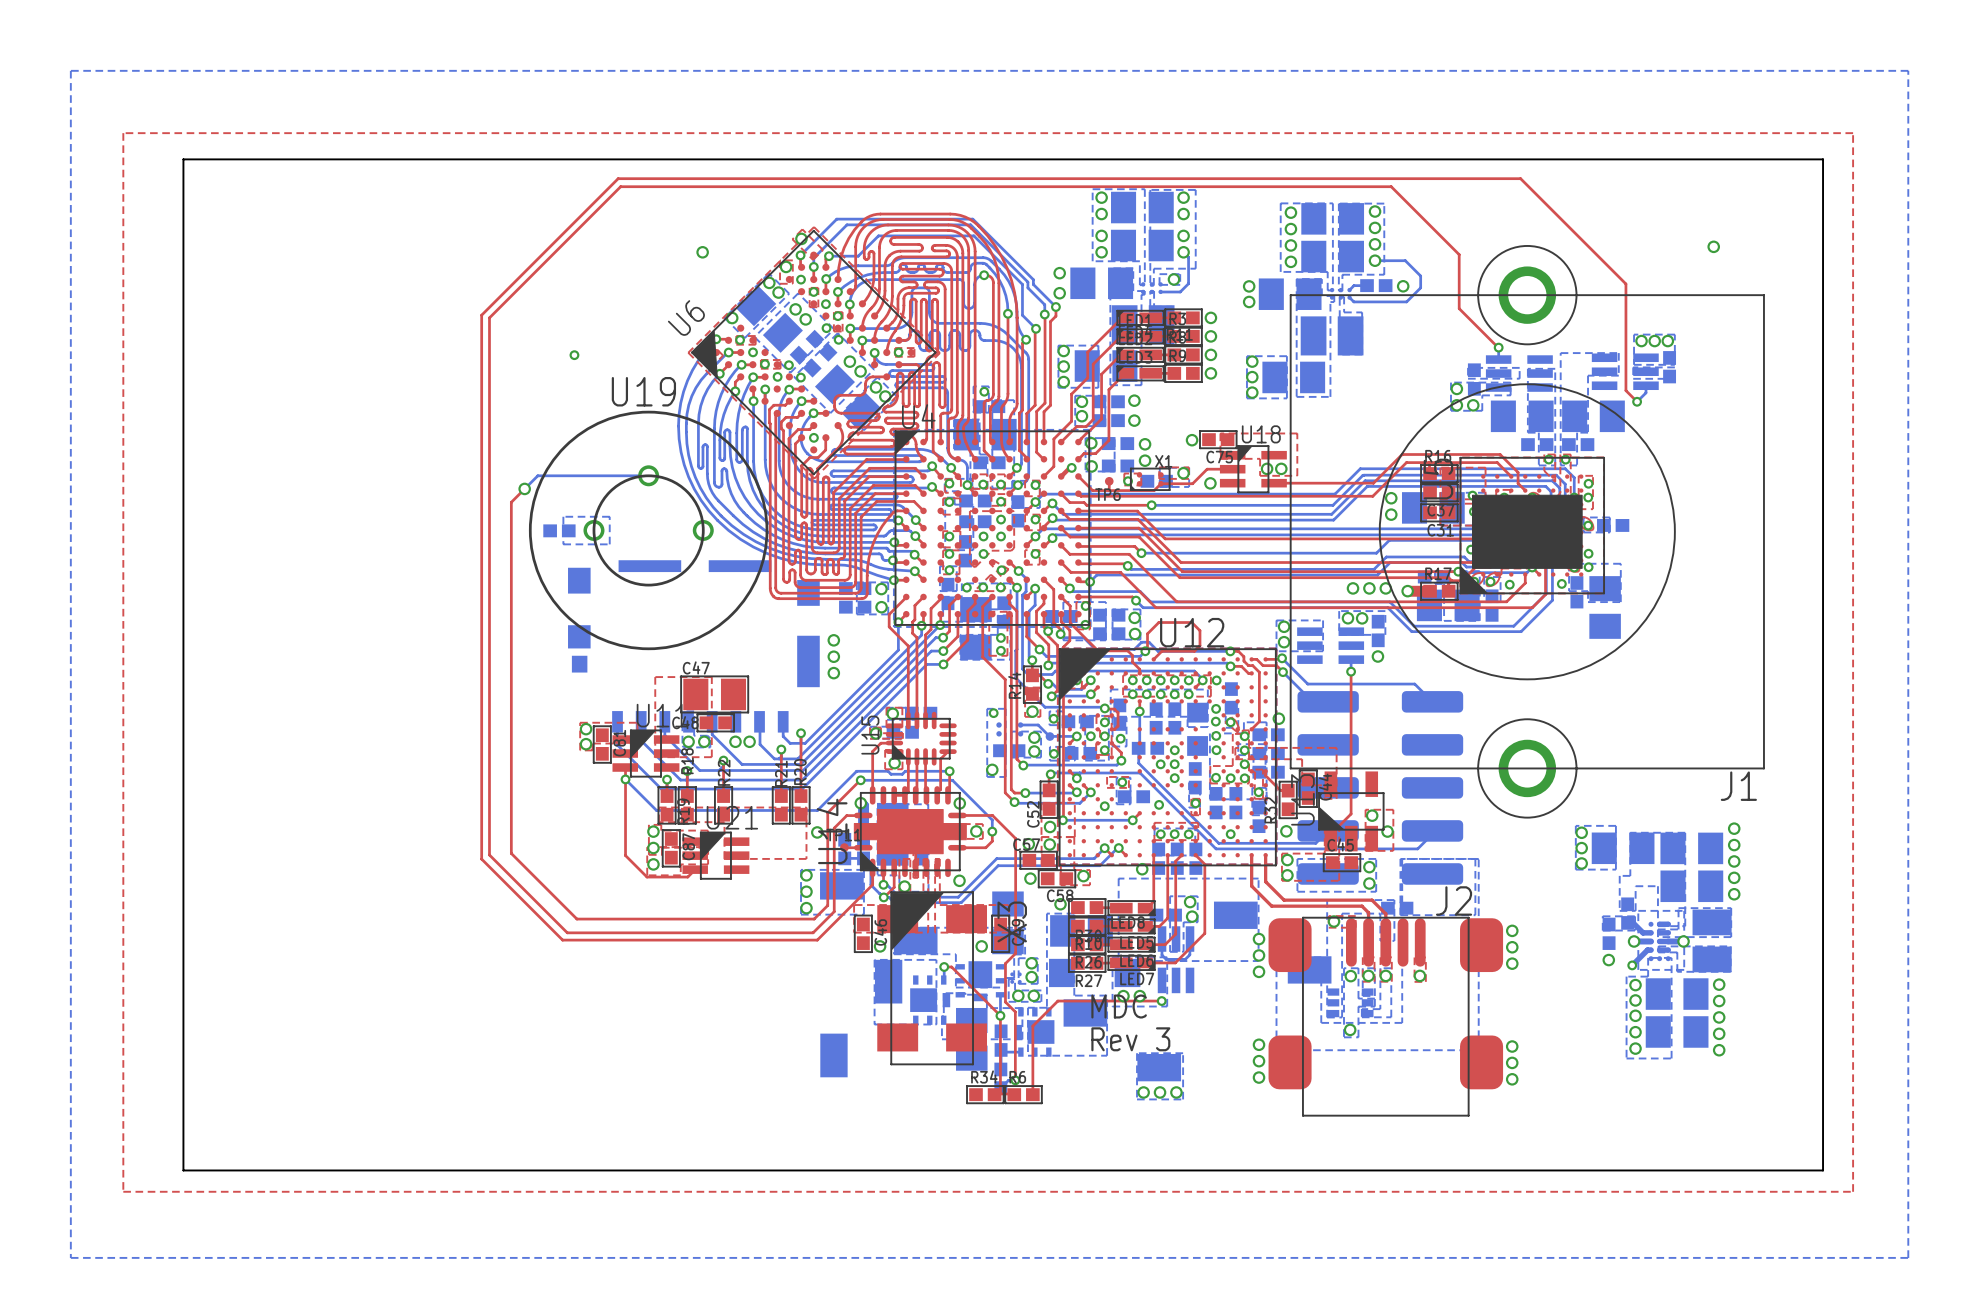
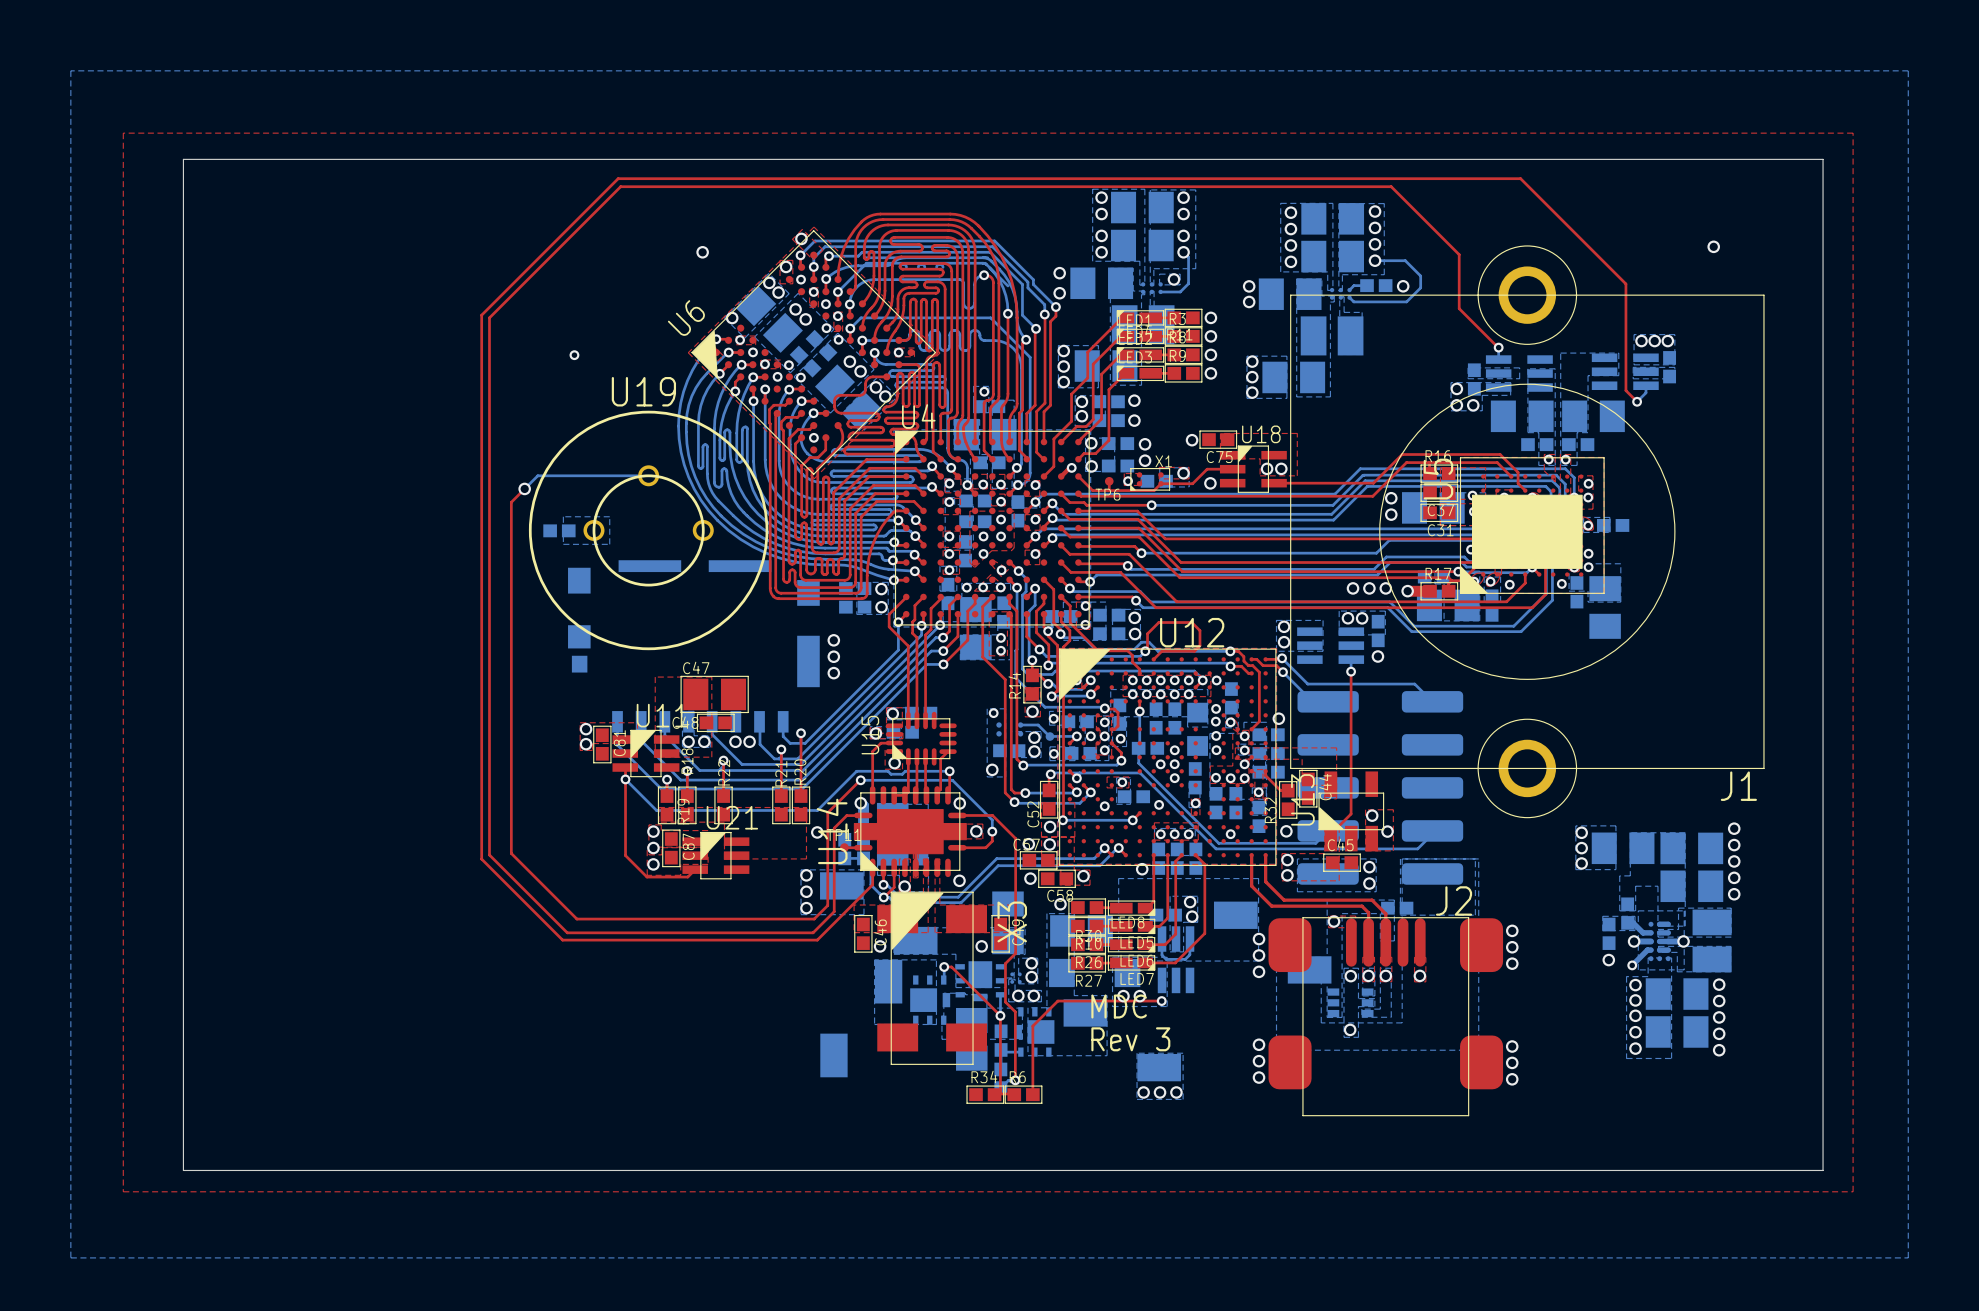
bottom track: (814, 240) (836, 219) (972, 219) (994, 240) -> (814, 240) (994, 240)
bottom track: (825, 246) (846, 224) (970, 224) (992, 246) -> (825, 246) (992, 246)
bottom track: (862, 252) (878, 235) (973, 235) (990, 252) -> (862, 252) (990, 252)
bottom track: (975, 263) (972, 264) (967, 272) (947, 272) (943, 267) -> none
bottom track: (900, 267) (896, 272) (876, 273) (859, 277) (837, 291) -> (975, 263) (866, 263) (837, 291)
bottom track: (906, 267) (911, 272) (916, 271) (918, 267) -> none
bottom track: (924, 267) (929, 272) (934, 271) (936, 267) -> none
bottom track: (850, 328) (895, 328) (903, 326) (911, 316) (912, 290) (916, 287) (924, 287) (929, 291) (929, 313) (934, 322) (985, 323) (999, 328) (1008, 334) (1026, 352) (1028, 358) (1028, 475) (1024, 482) (1017, 485) -> (850, 328) (861, 317) (990, 317) (1030, 357) (1030, 474) (1025, 482) (1017, 485)

